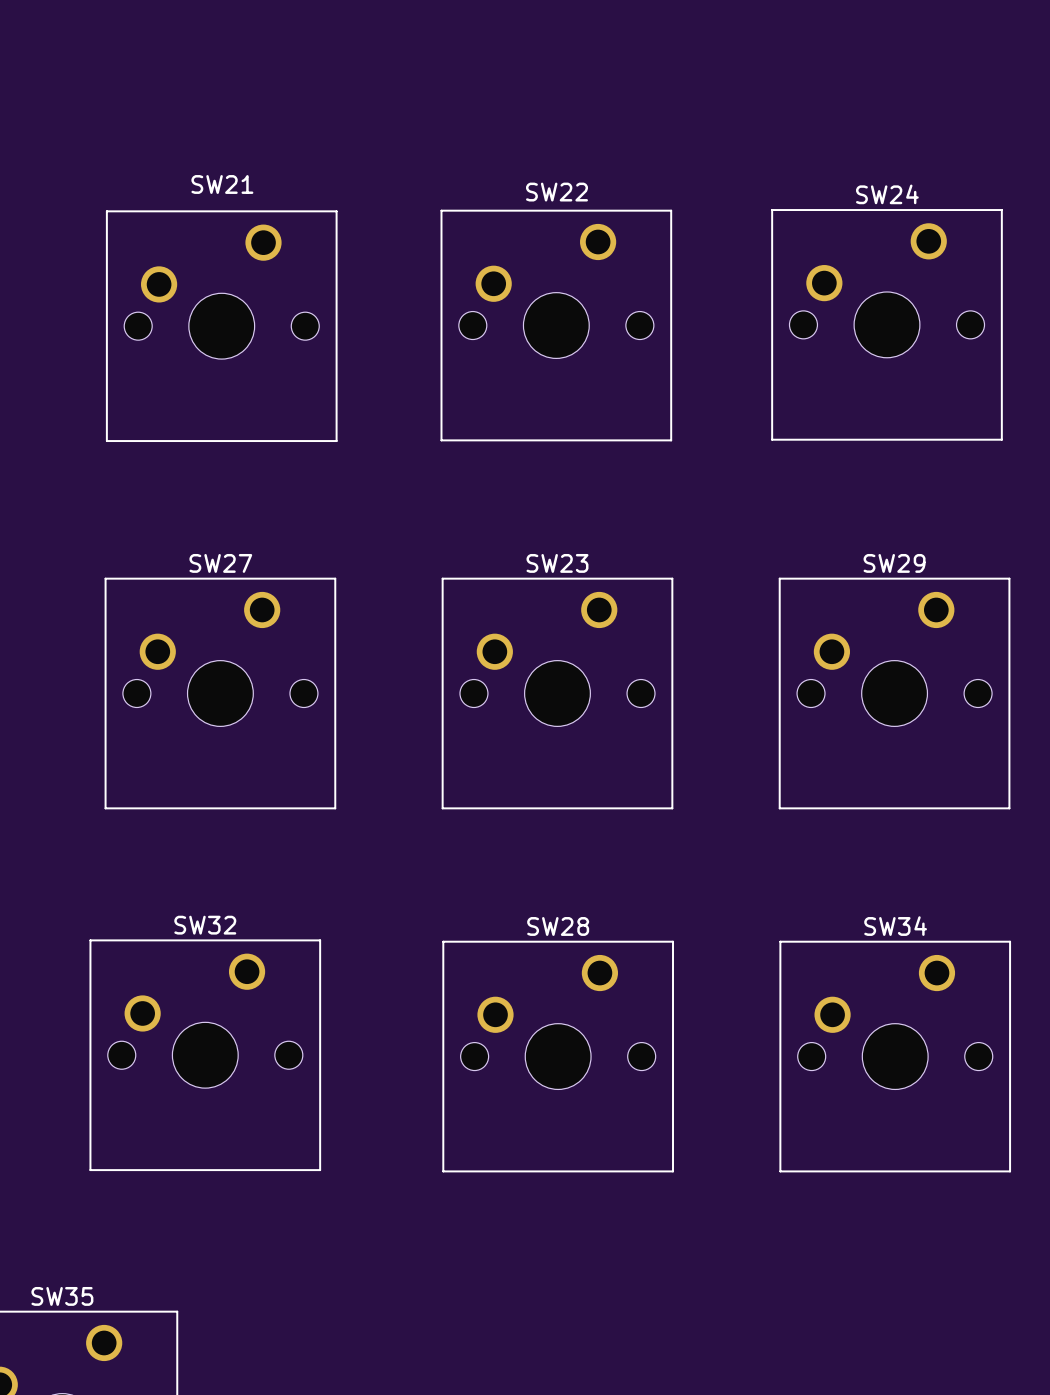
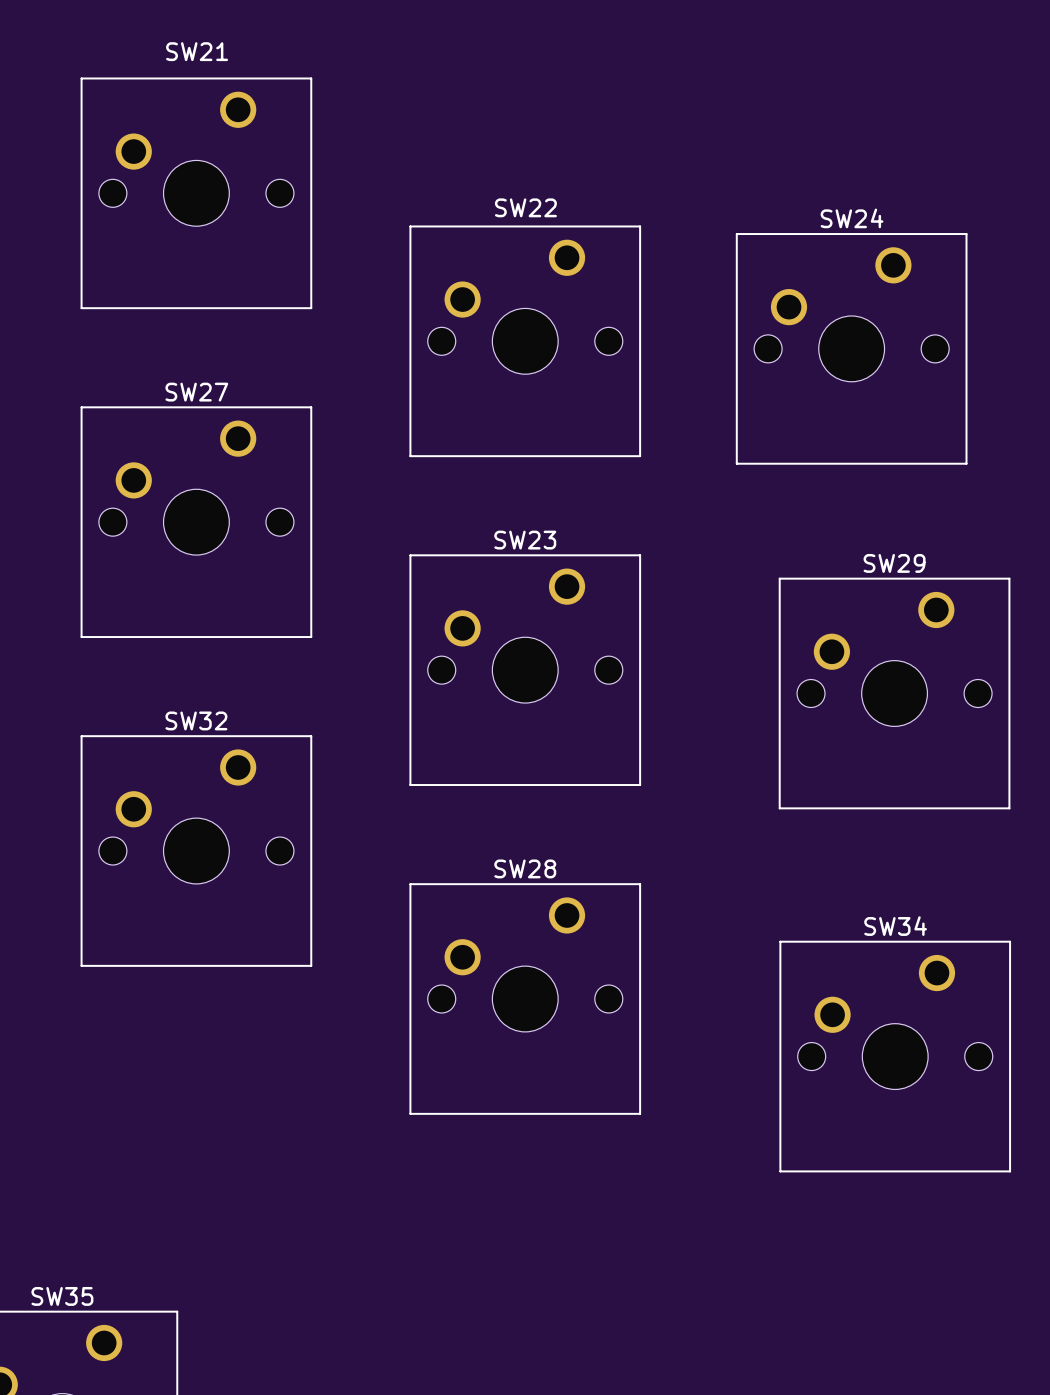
SW24 position: (887, 324) -> (851, 348)
SW22 position: (556, 325) -> (525, 341)
SW21 position: (221, 326) -> (196, 193)
SW27 position: (220, 693) -> (196, 522)
SW23 position: (557, 693) -> (525, 670)
SW32 position: (205, 1055) -> (196, 851)
SW28 position: (558, 1056) -> (525, 999)

